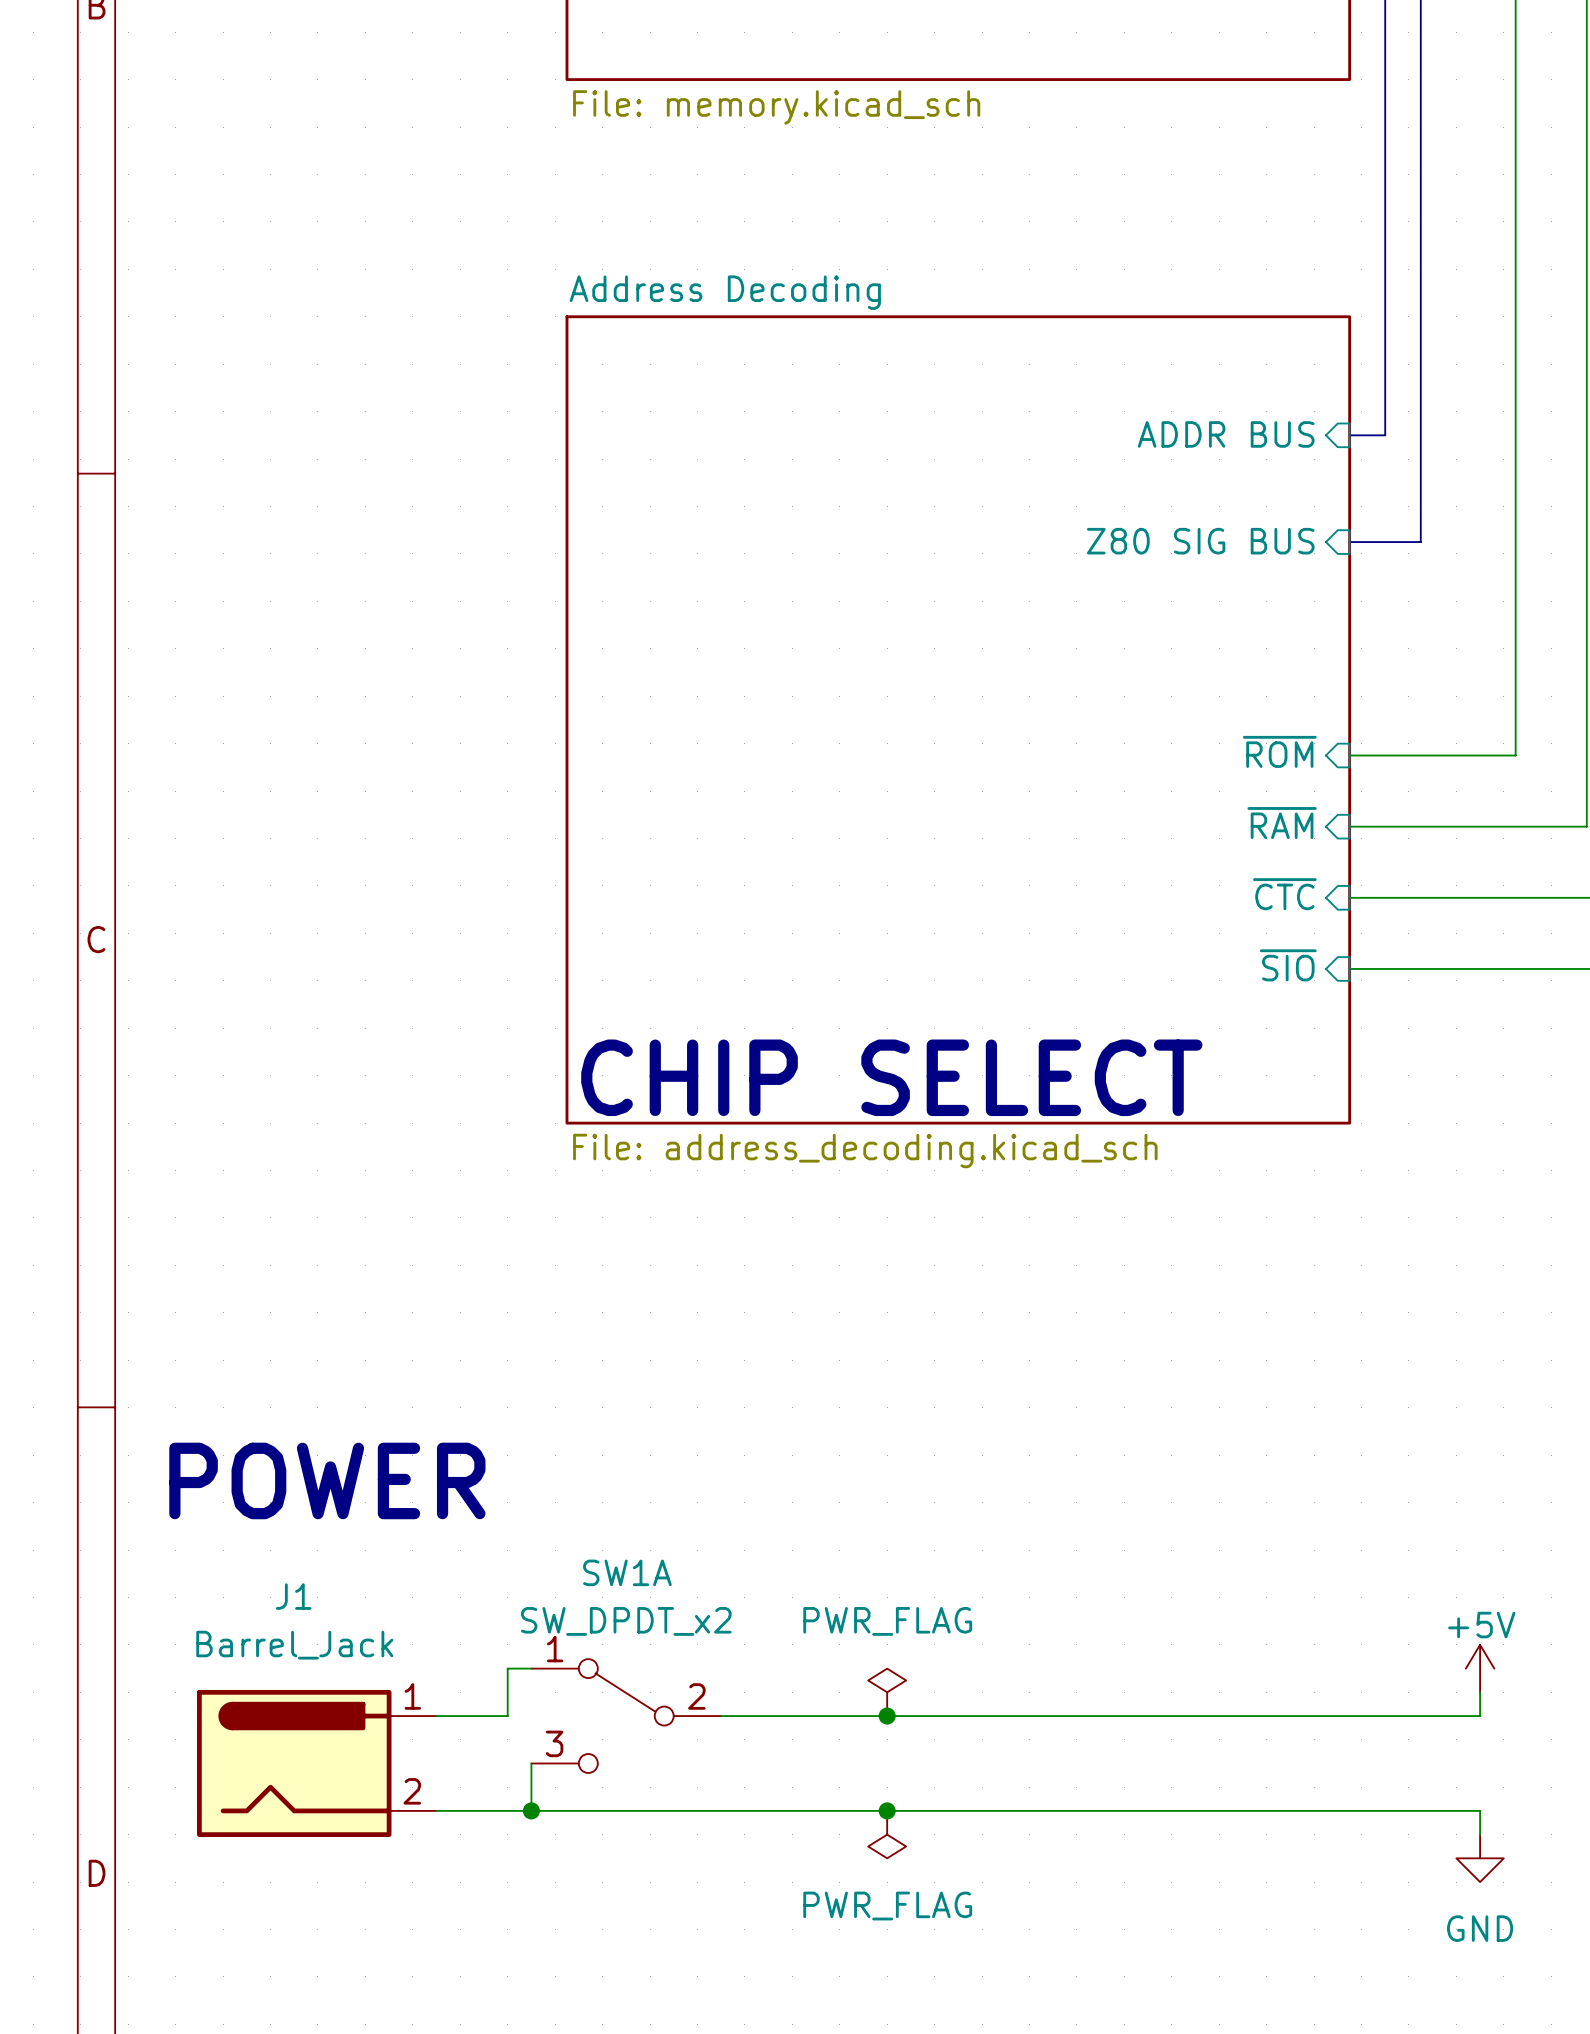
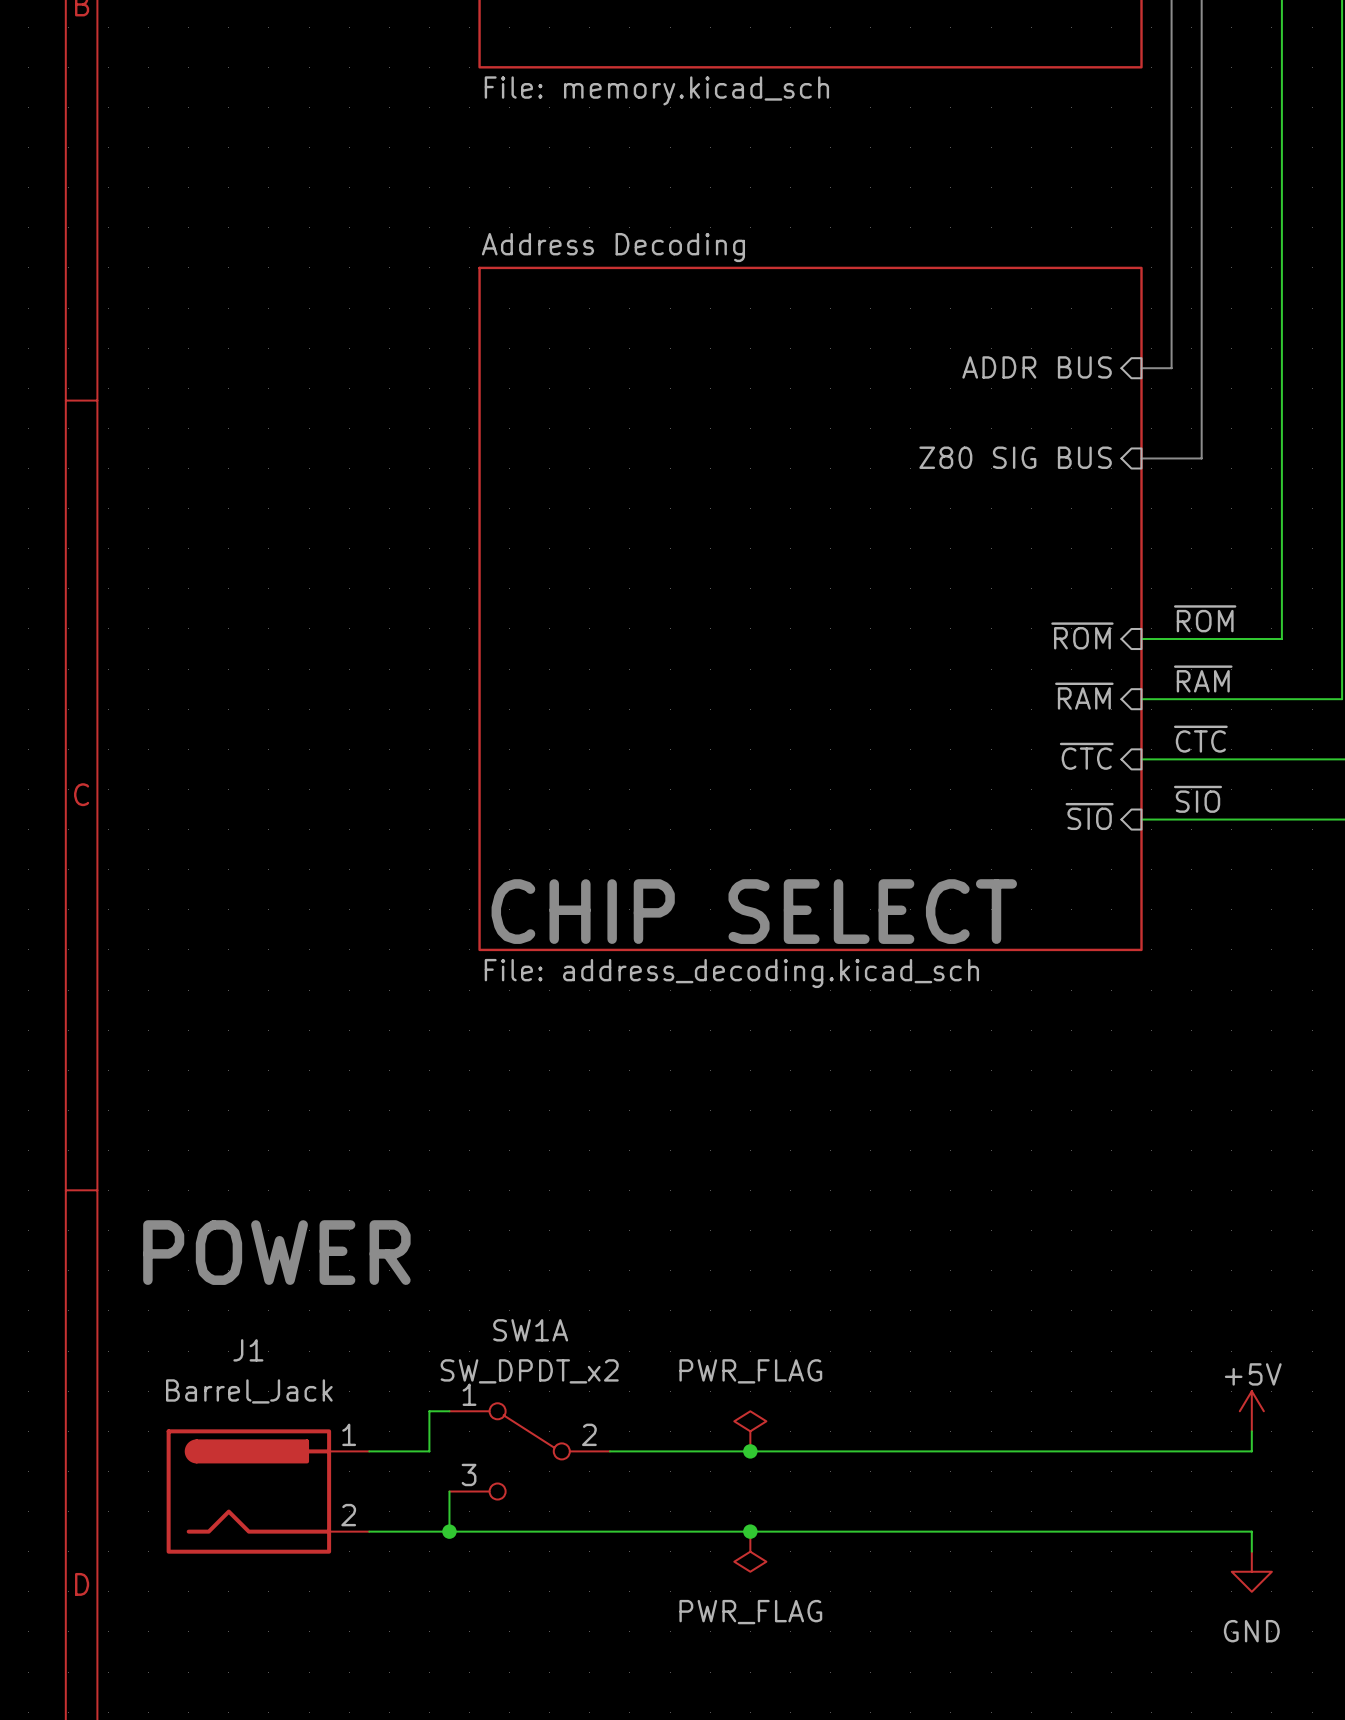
label: none -> ~{ROM} (1205, 618)
label: none -> ~{RAM} (1203, 678)
label: none -> ~{CTC} (1200, 739)
label: none -> ~{SIO} (1198, 799)

